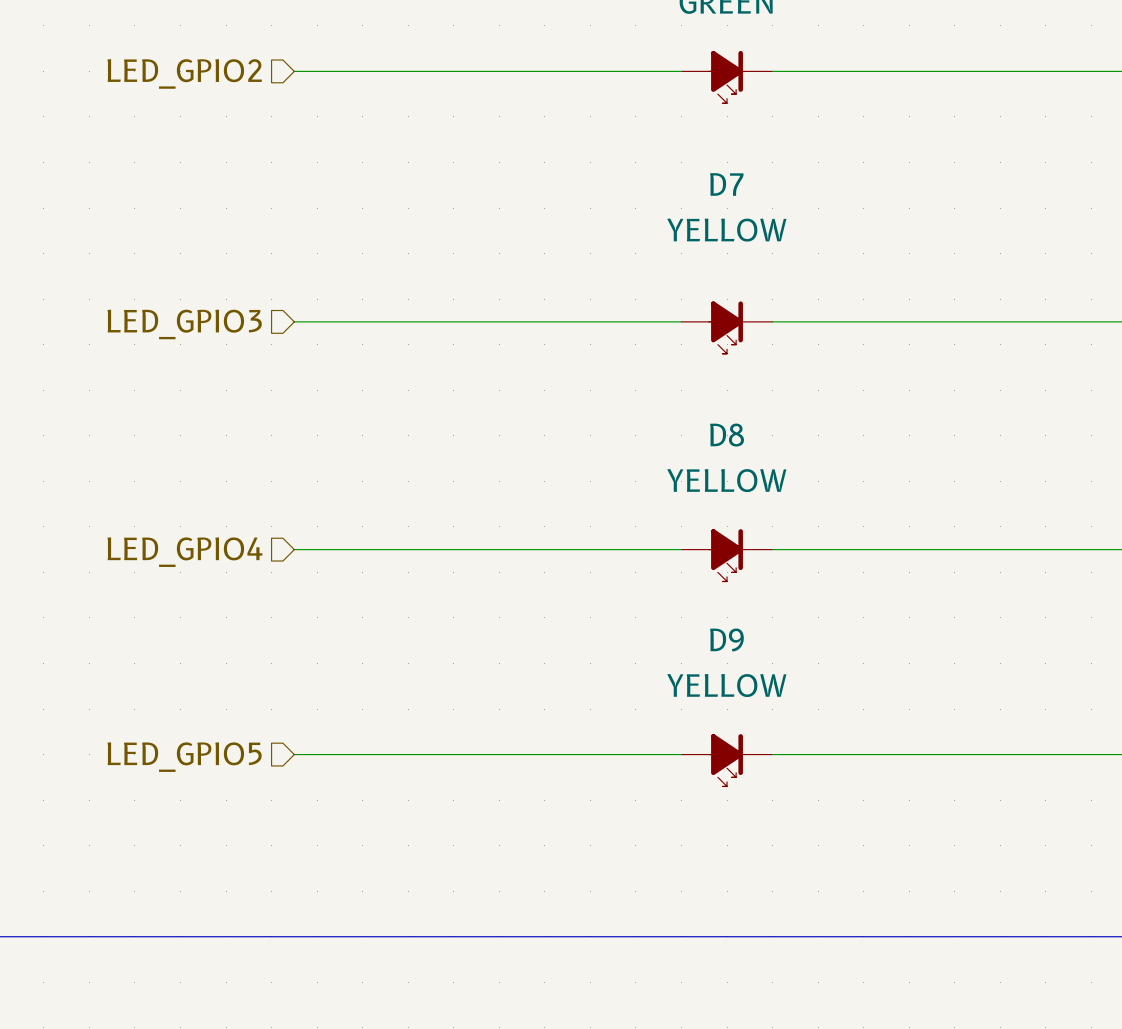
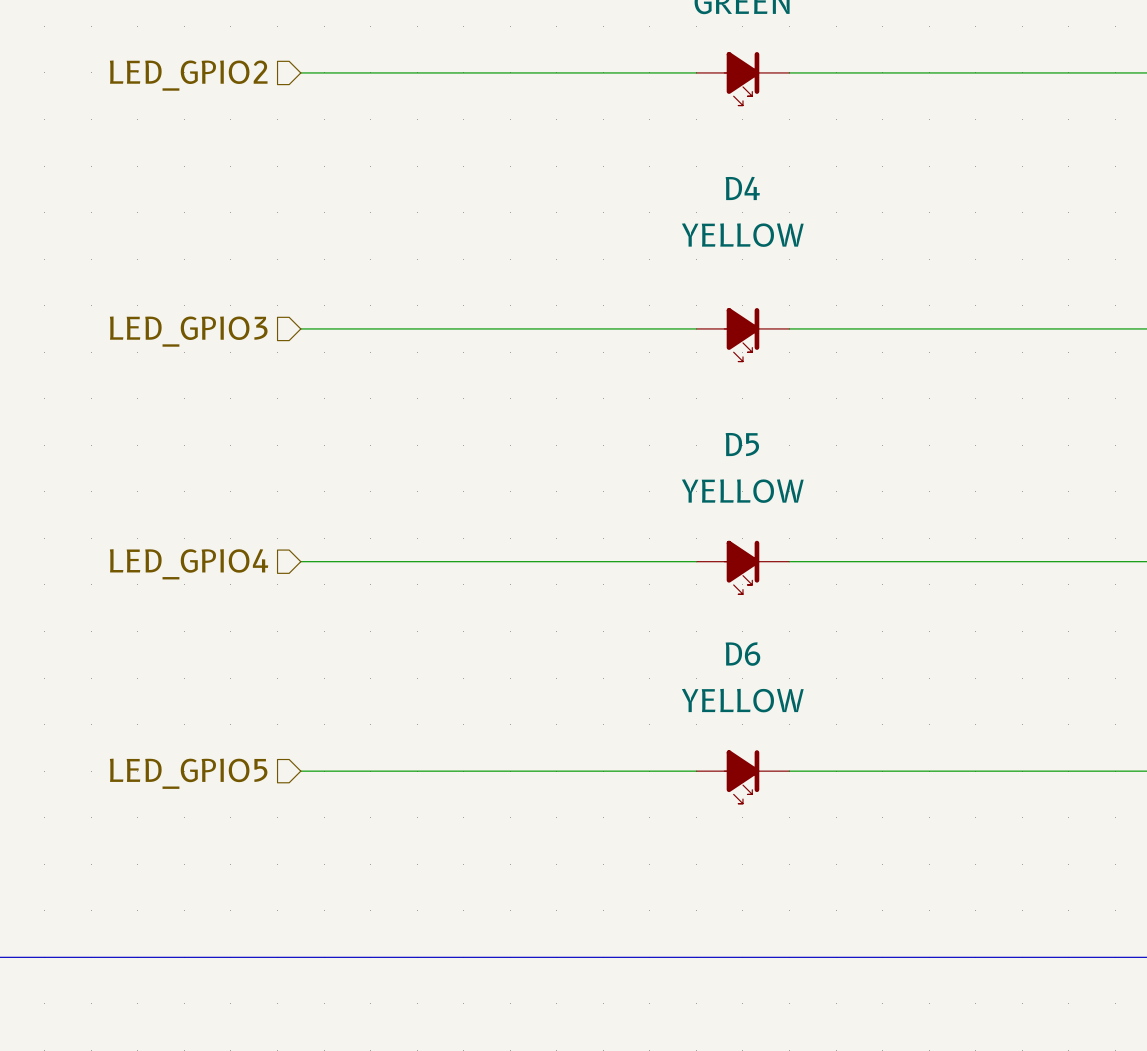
D7 name: D7 (726, 184) -> D4 (742, 188)
D8 name: D8 (727, 435) -> D5 (742, 444)
D9 name: D9 (726, 640) -> D6 (742, 654)

